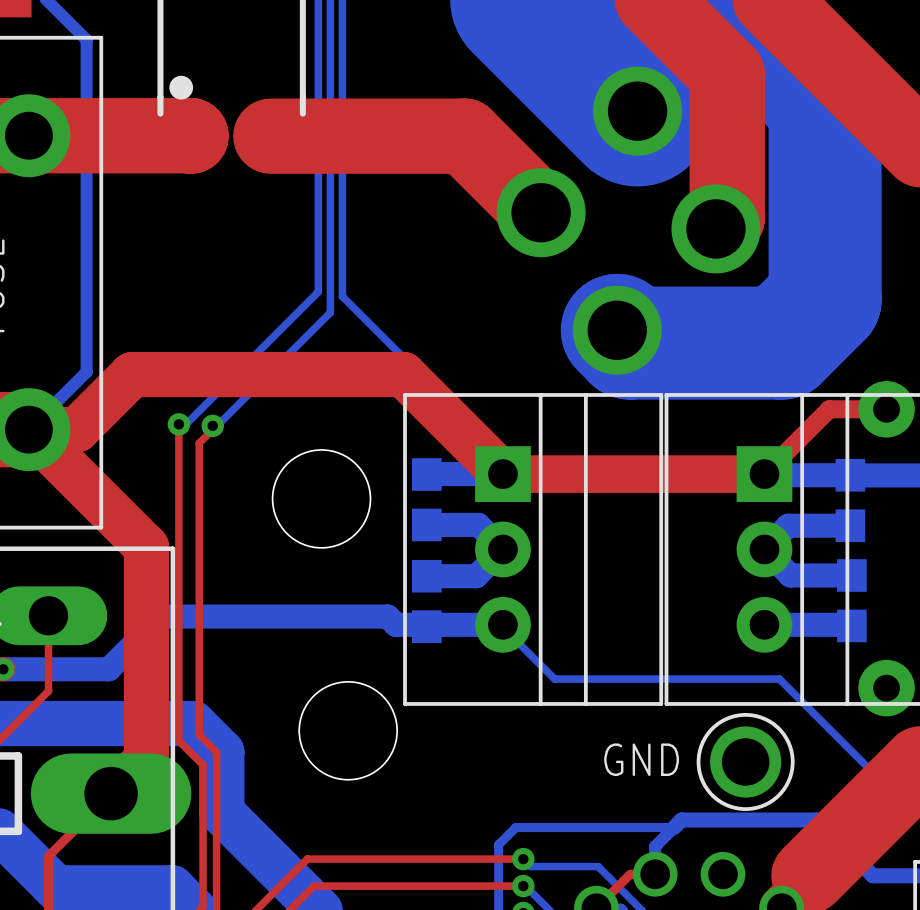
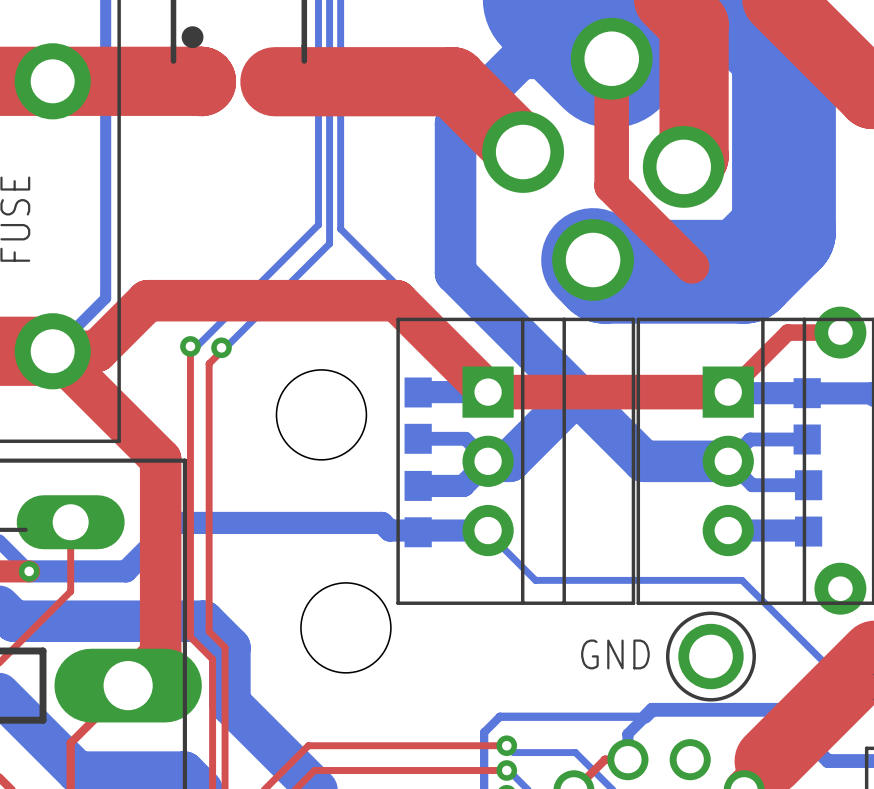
bottom track: none -> (611, 58) (520, 58) (455, 123) (455, 273) (643, 461) (728, 461) (717, 461)
top track: none -> (611, 58) (611, 185) (692, 266)
bottom track: none -> (576, 394) (509, 461) (488, 461)
bottom track width: thick (426, 524) (478, 524) (502, 549) -> thin (418, 438) (465, 438) (488, 461)
bottom track width: thick (850, 525) (788, 525) (764, 549) (790, 575) (851, 575) -> thin (807, 439) (750, 439) (728, 461) (752, 485) (808, 485)

